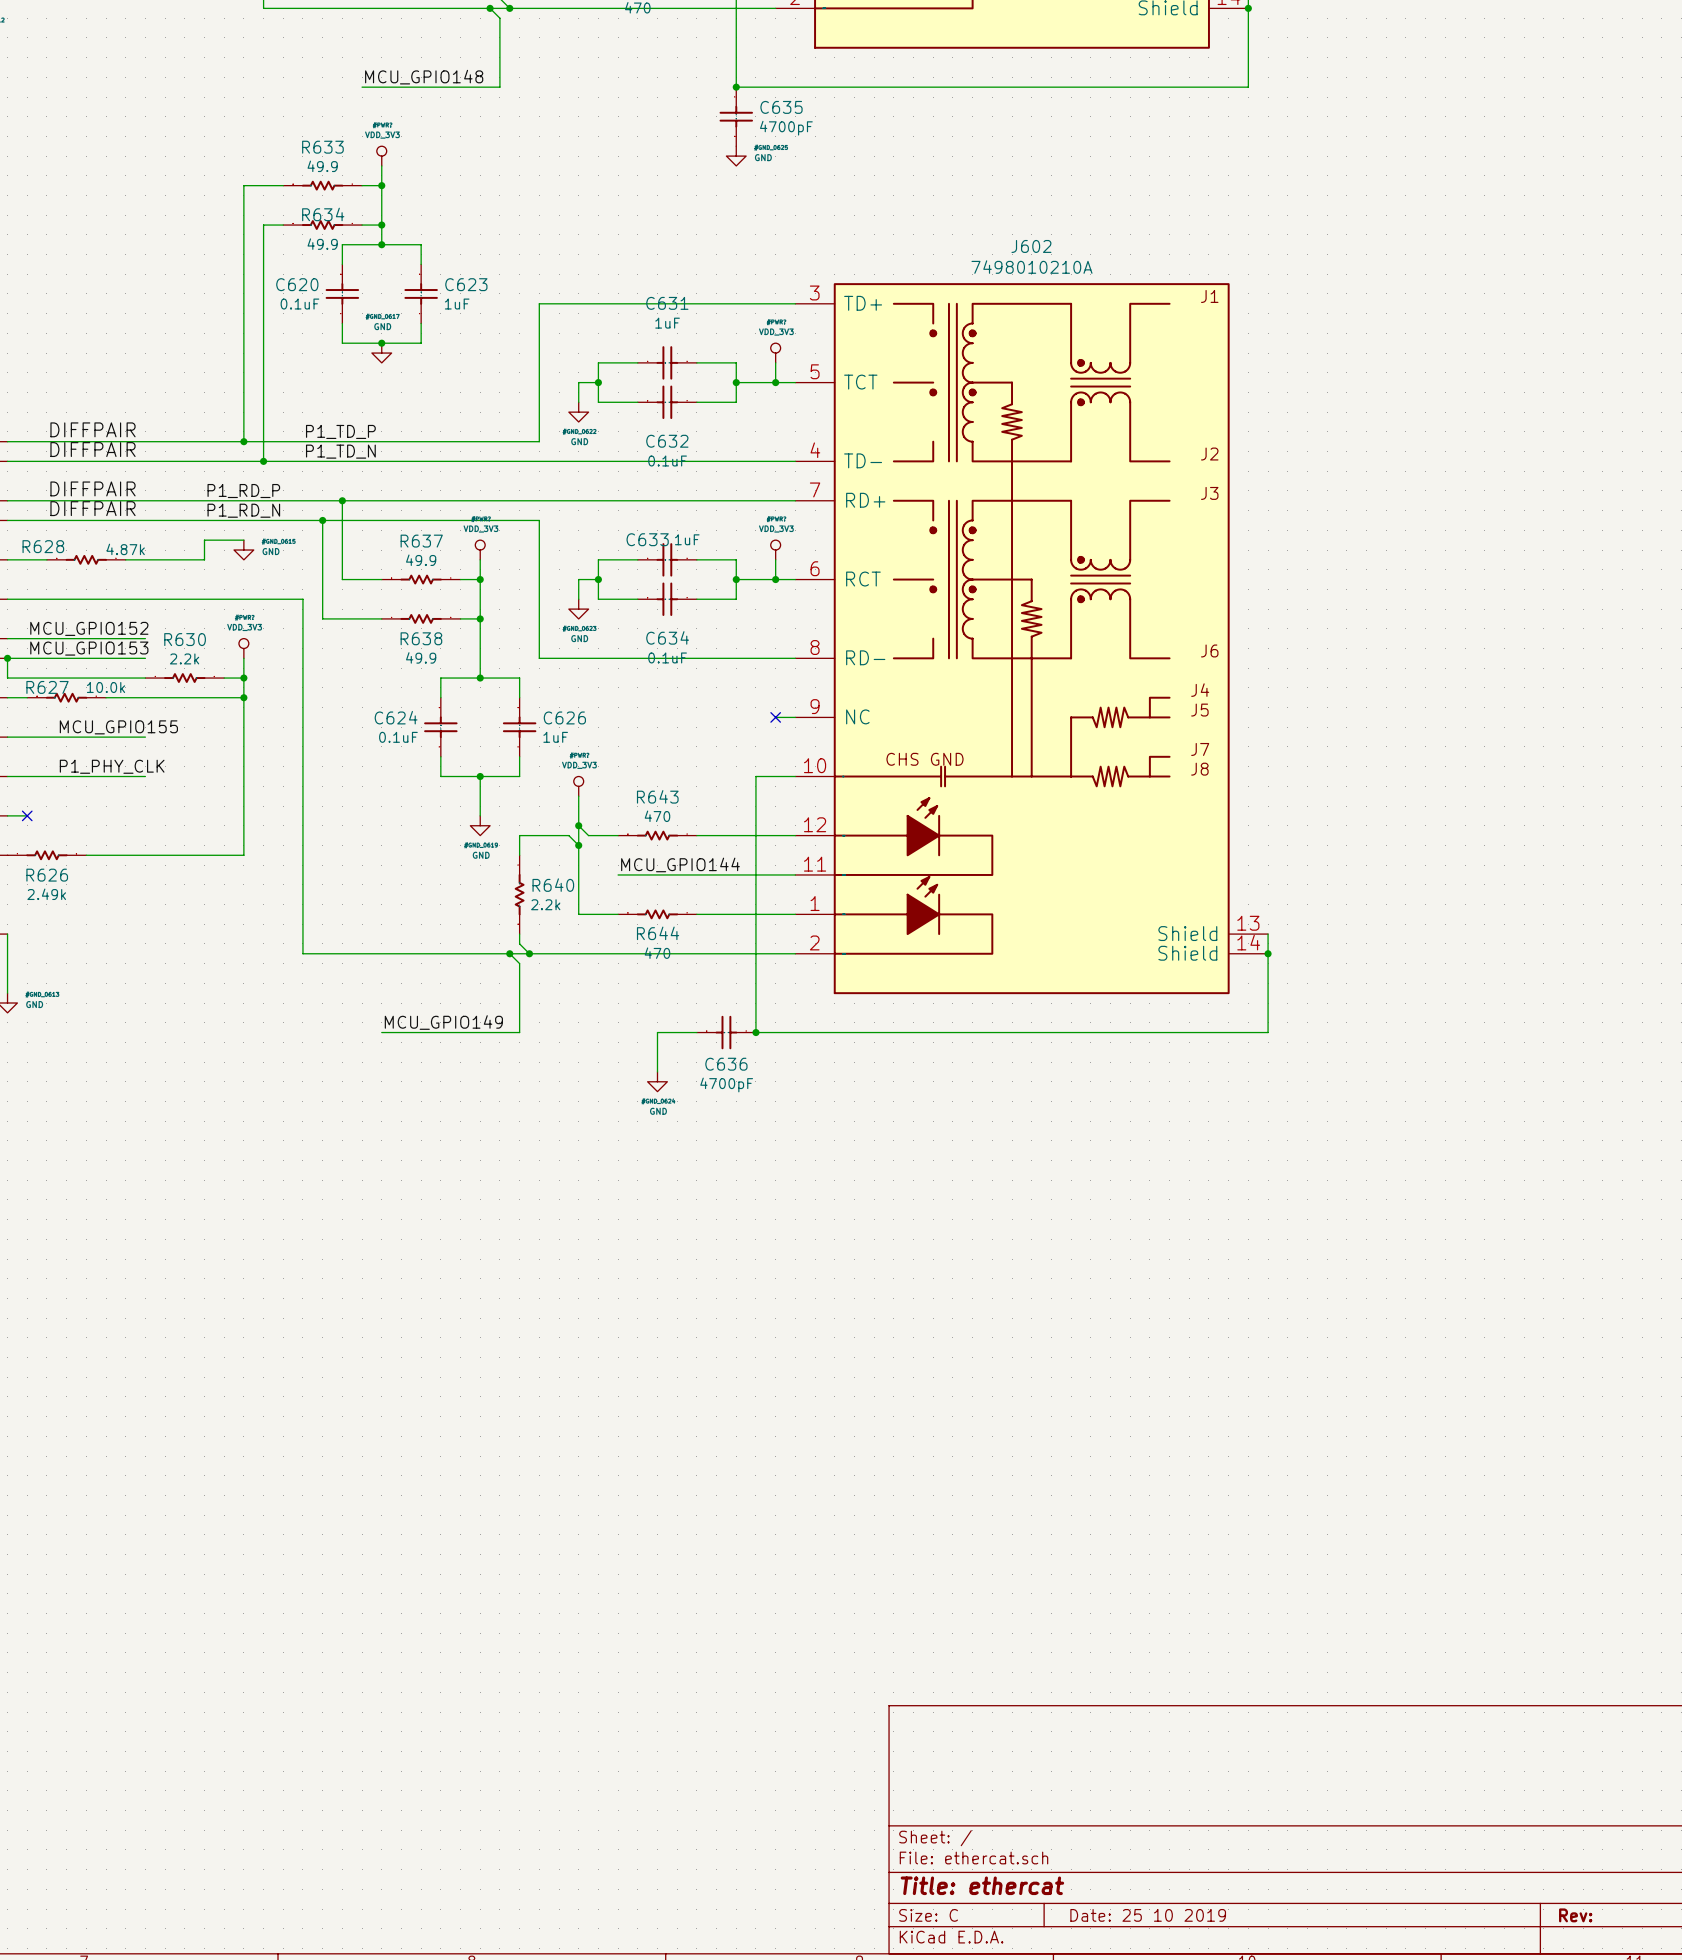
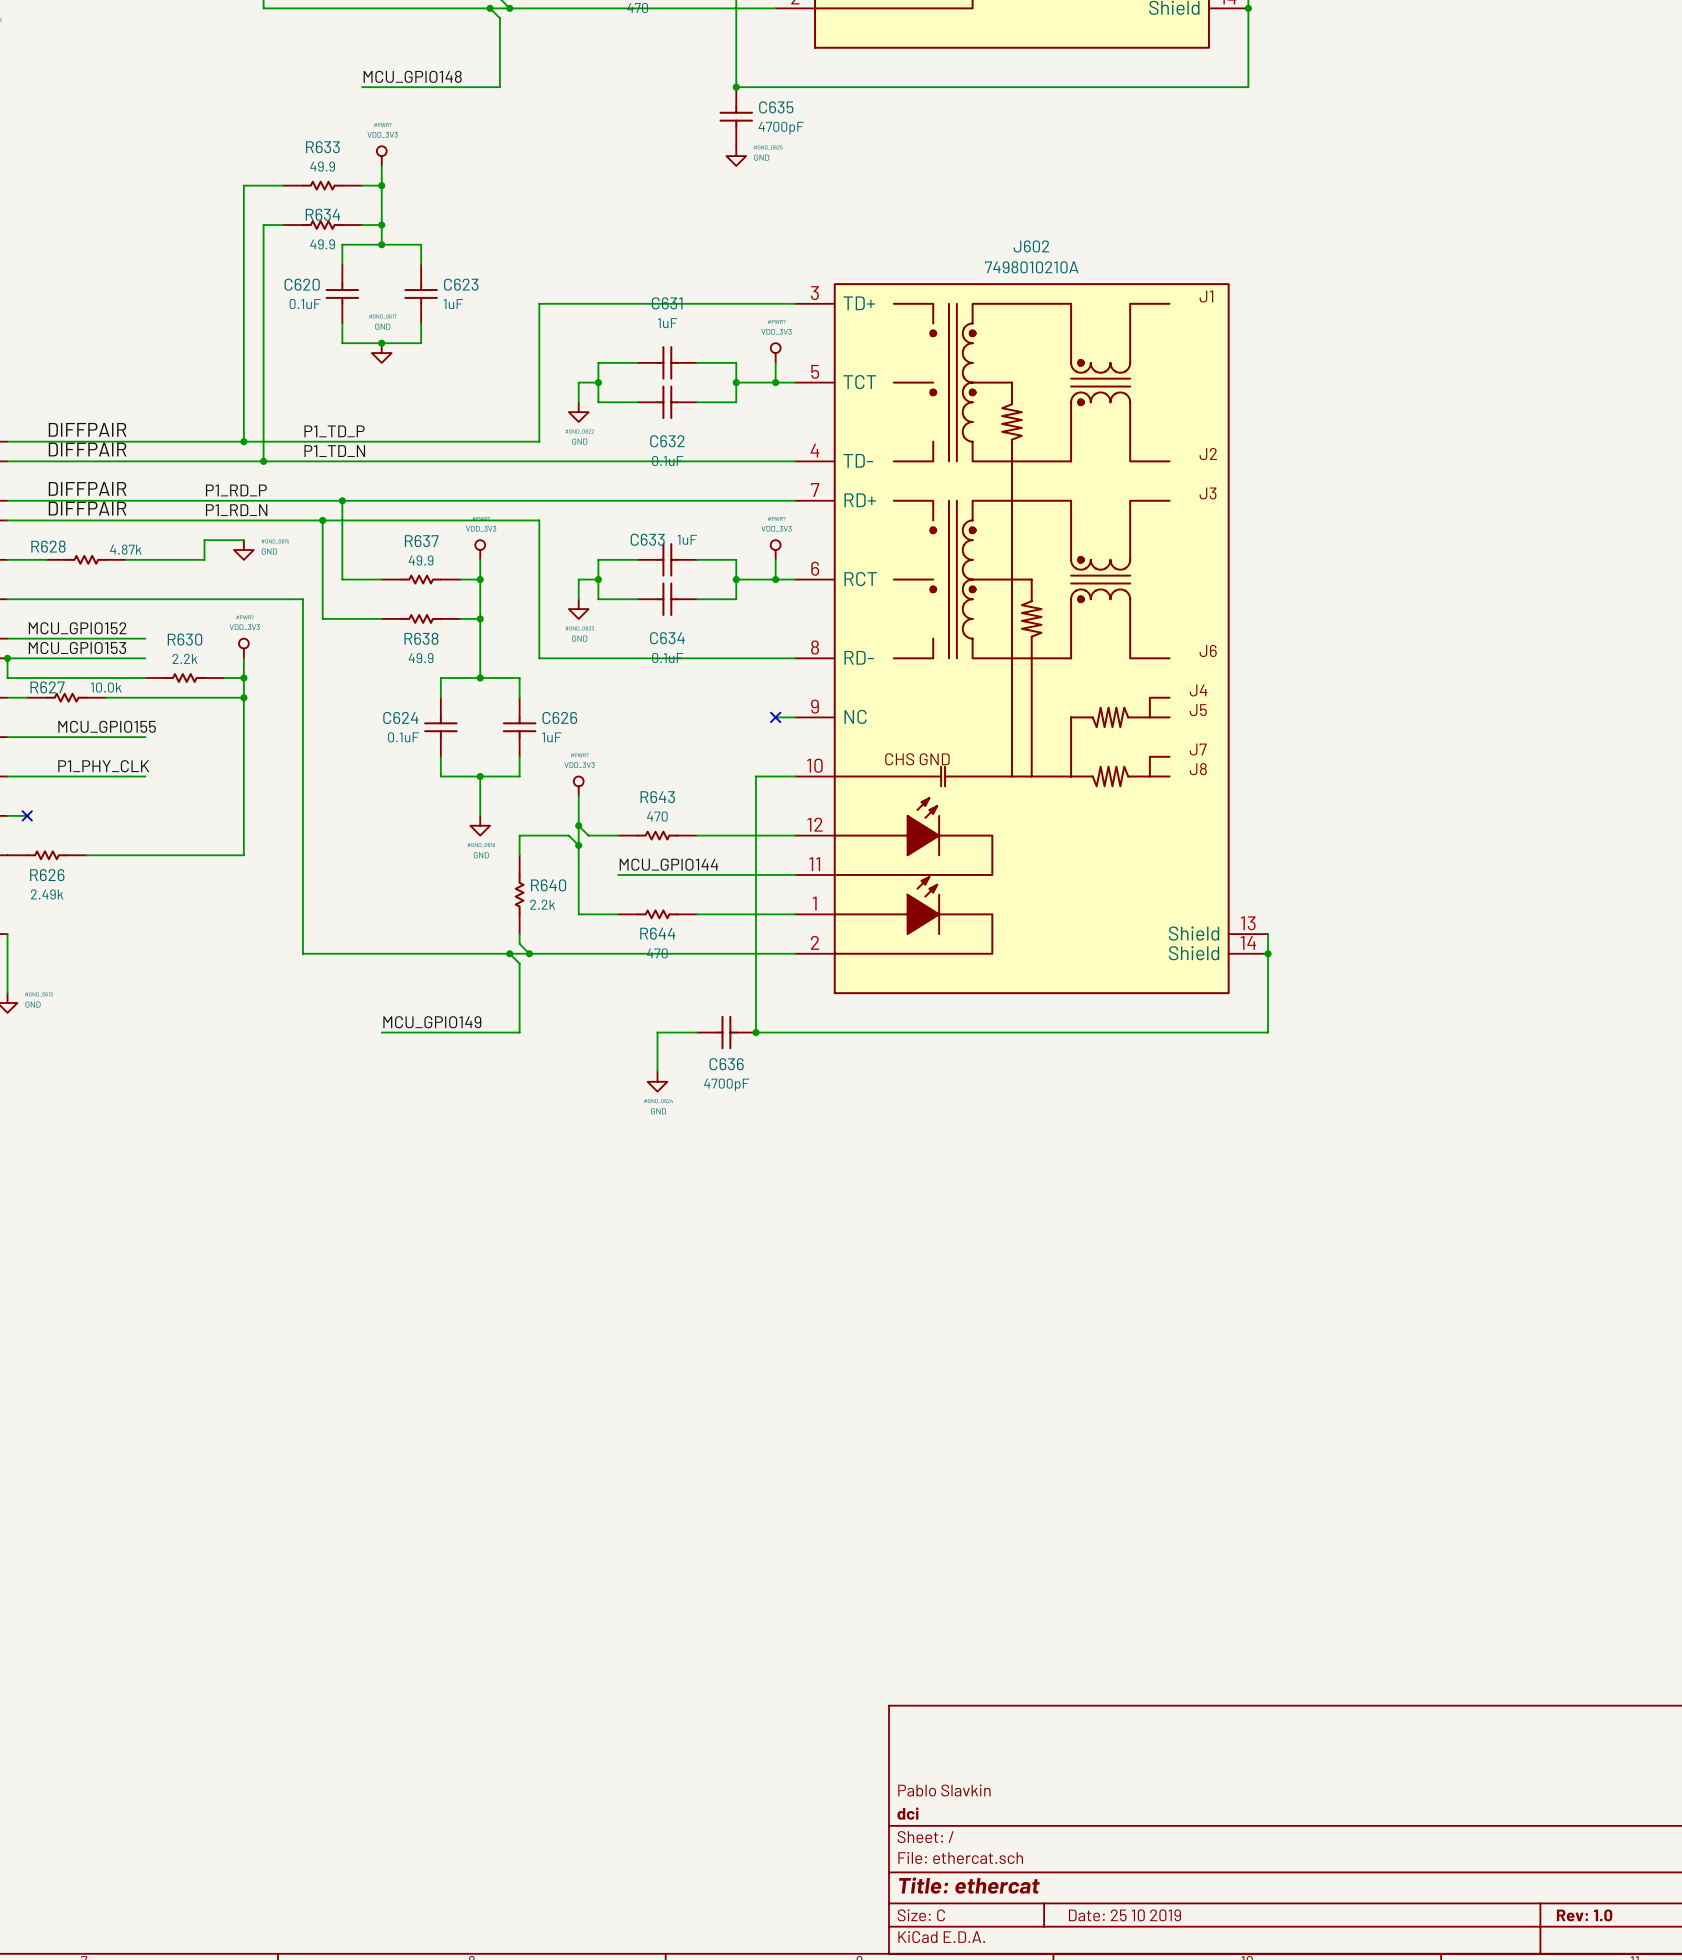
title block: none -> Pablo Slavkin (944, 1790)
title block: none -> dci (908, 1813)
title block: Rev: (1575, 1915) -> Rev: 1.0 (1584, 1915)

